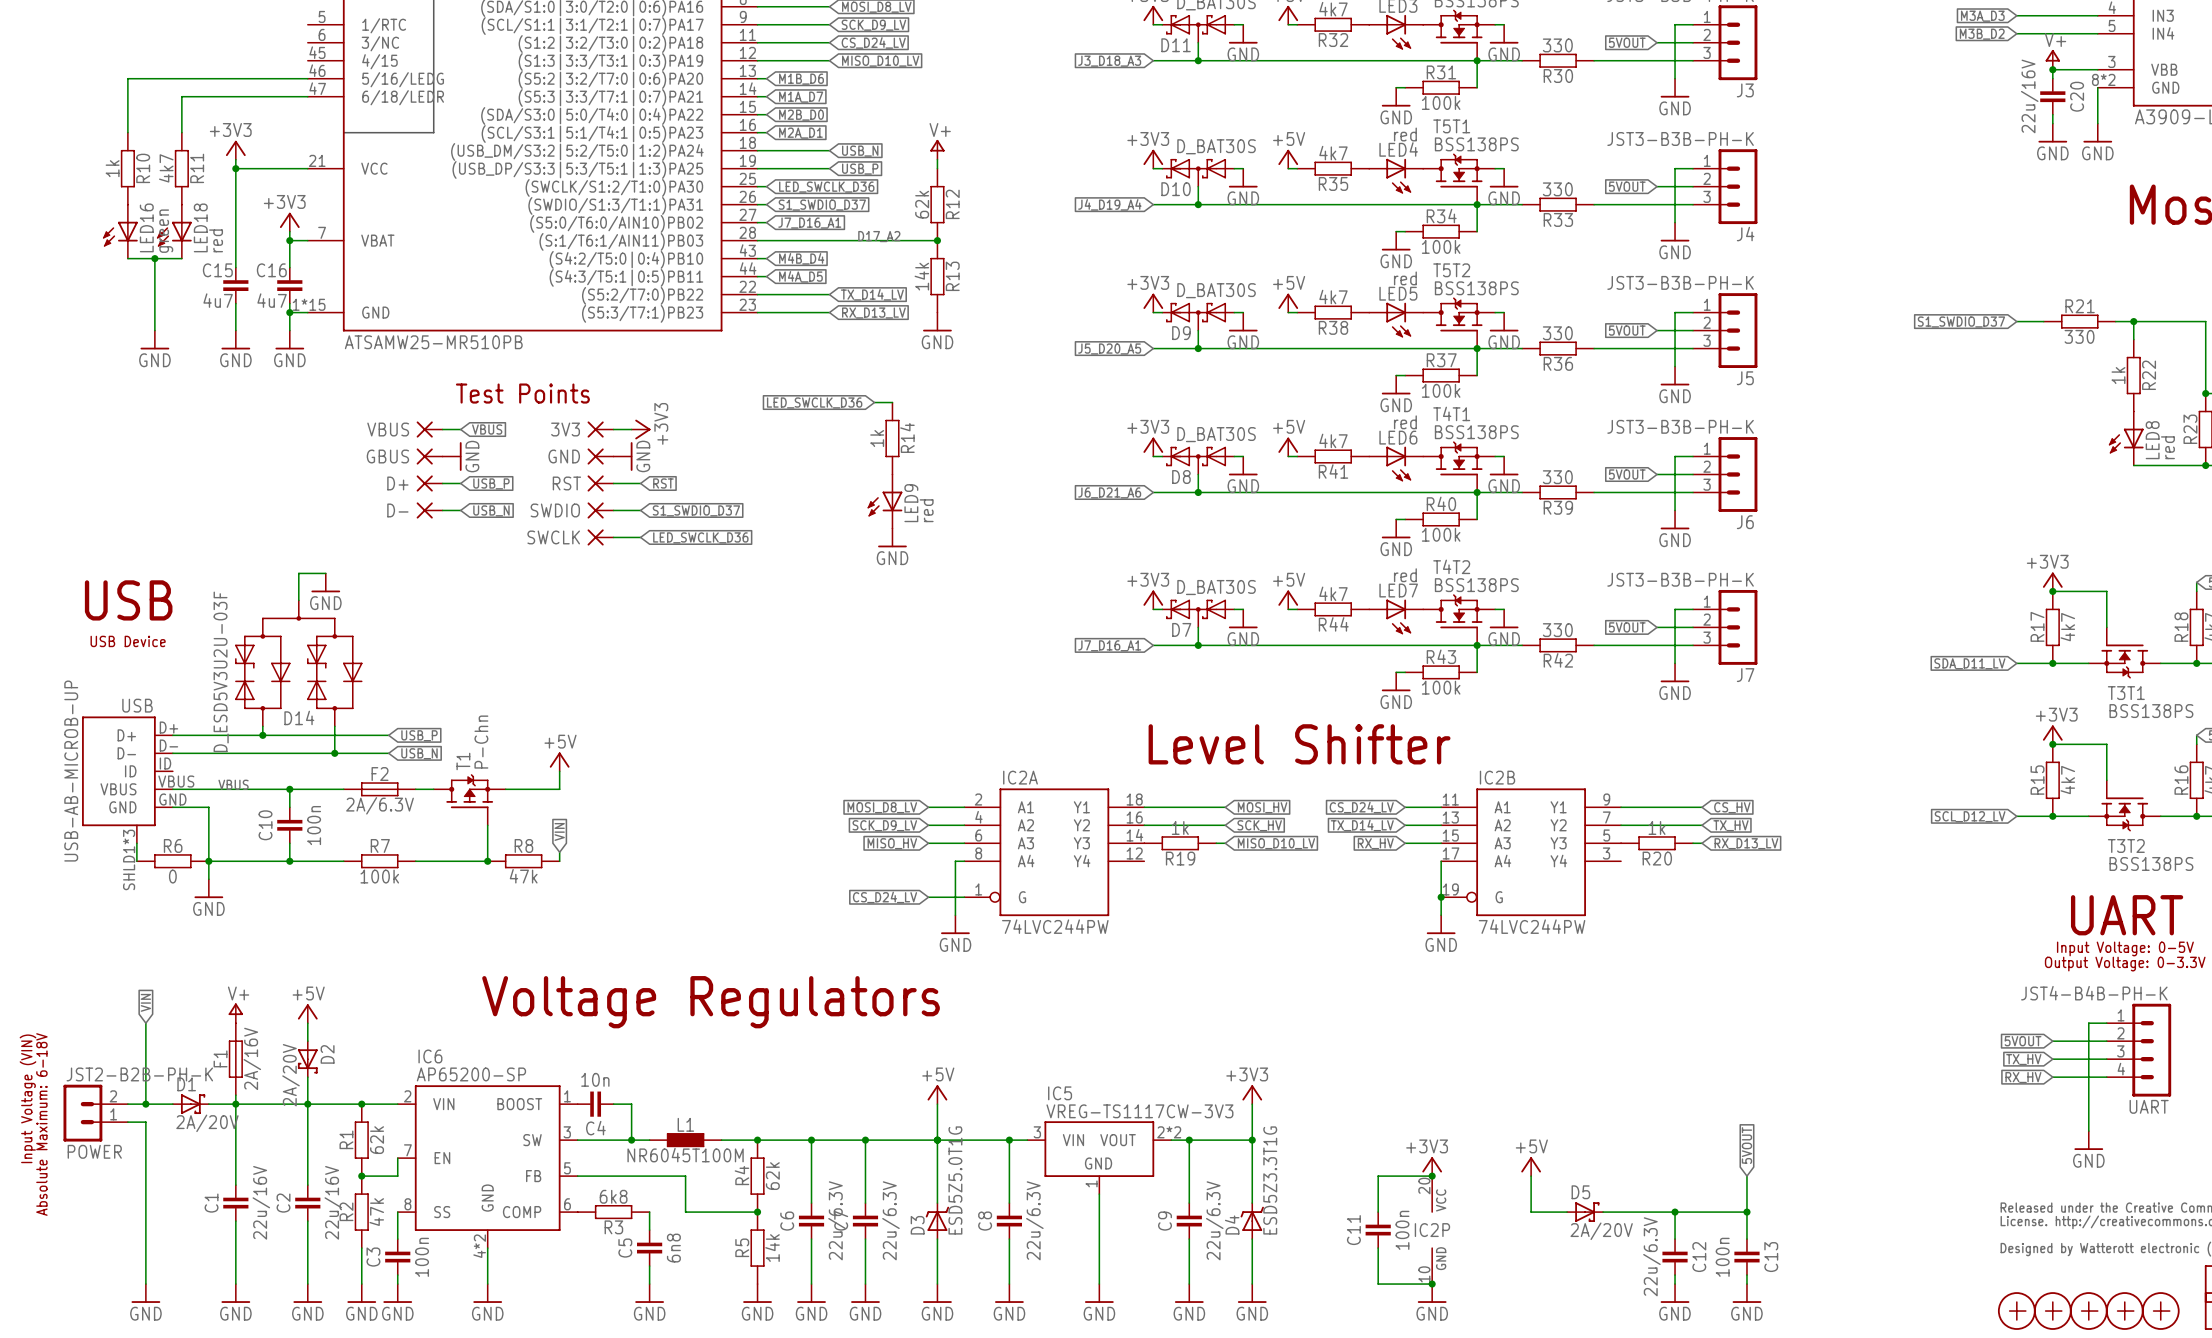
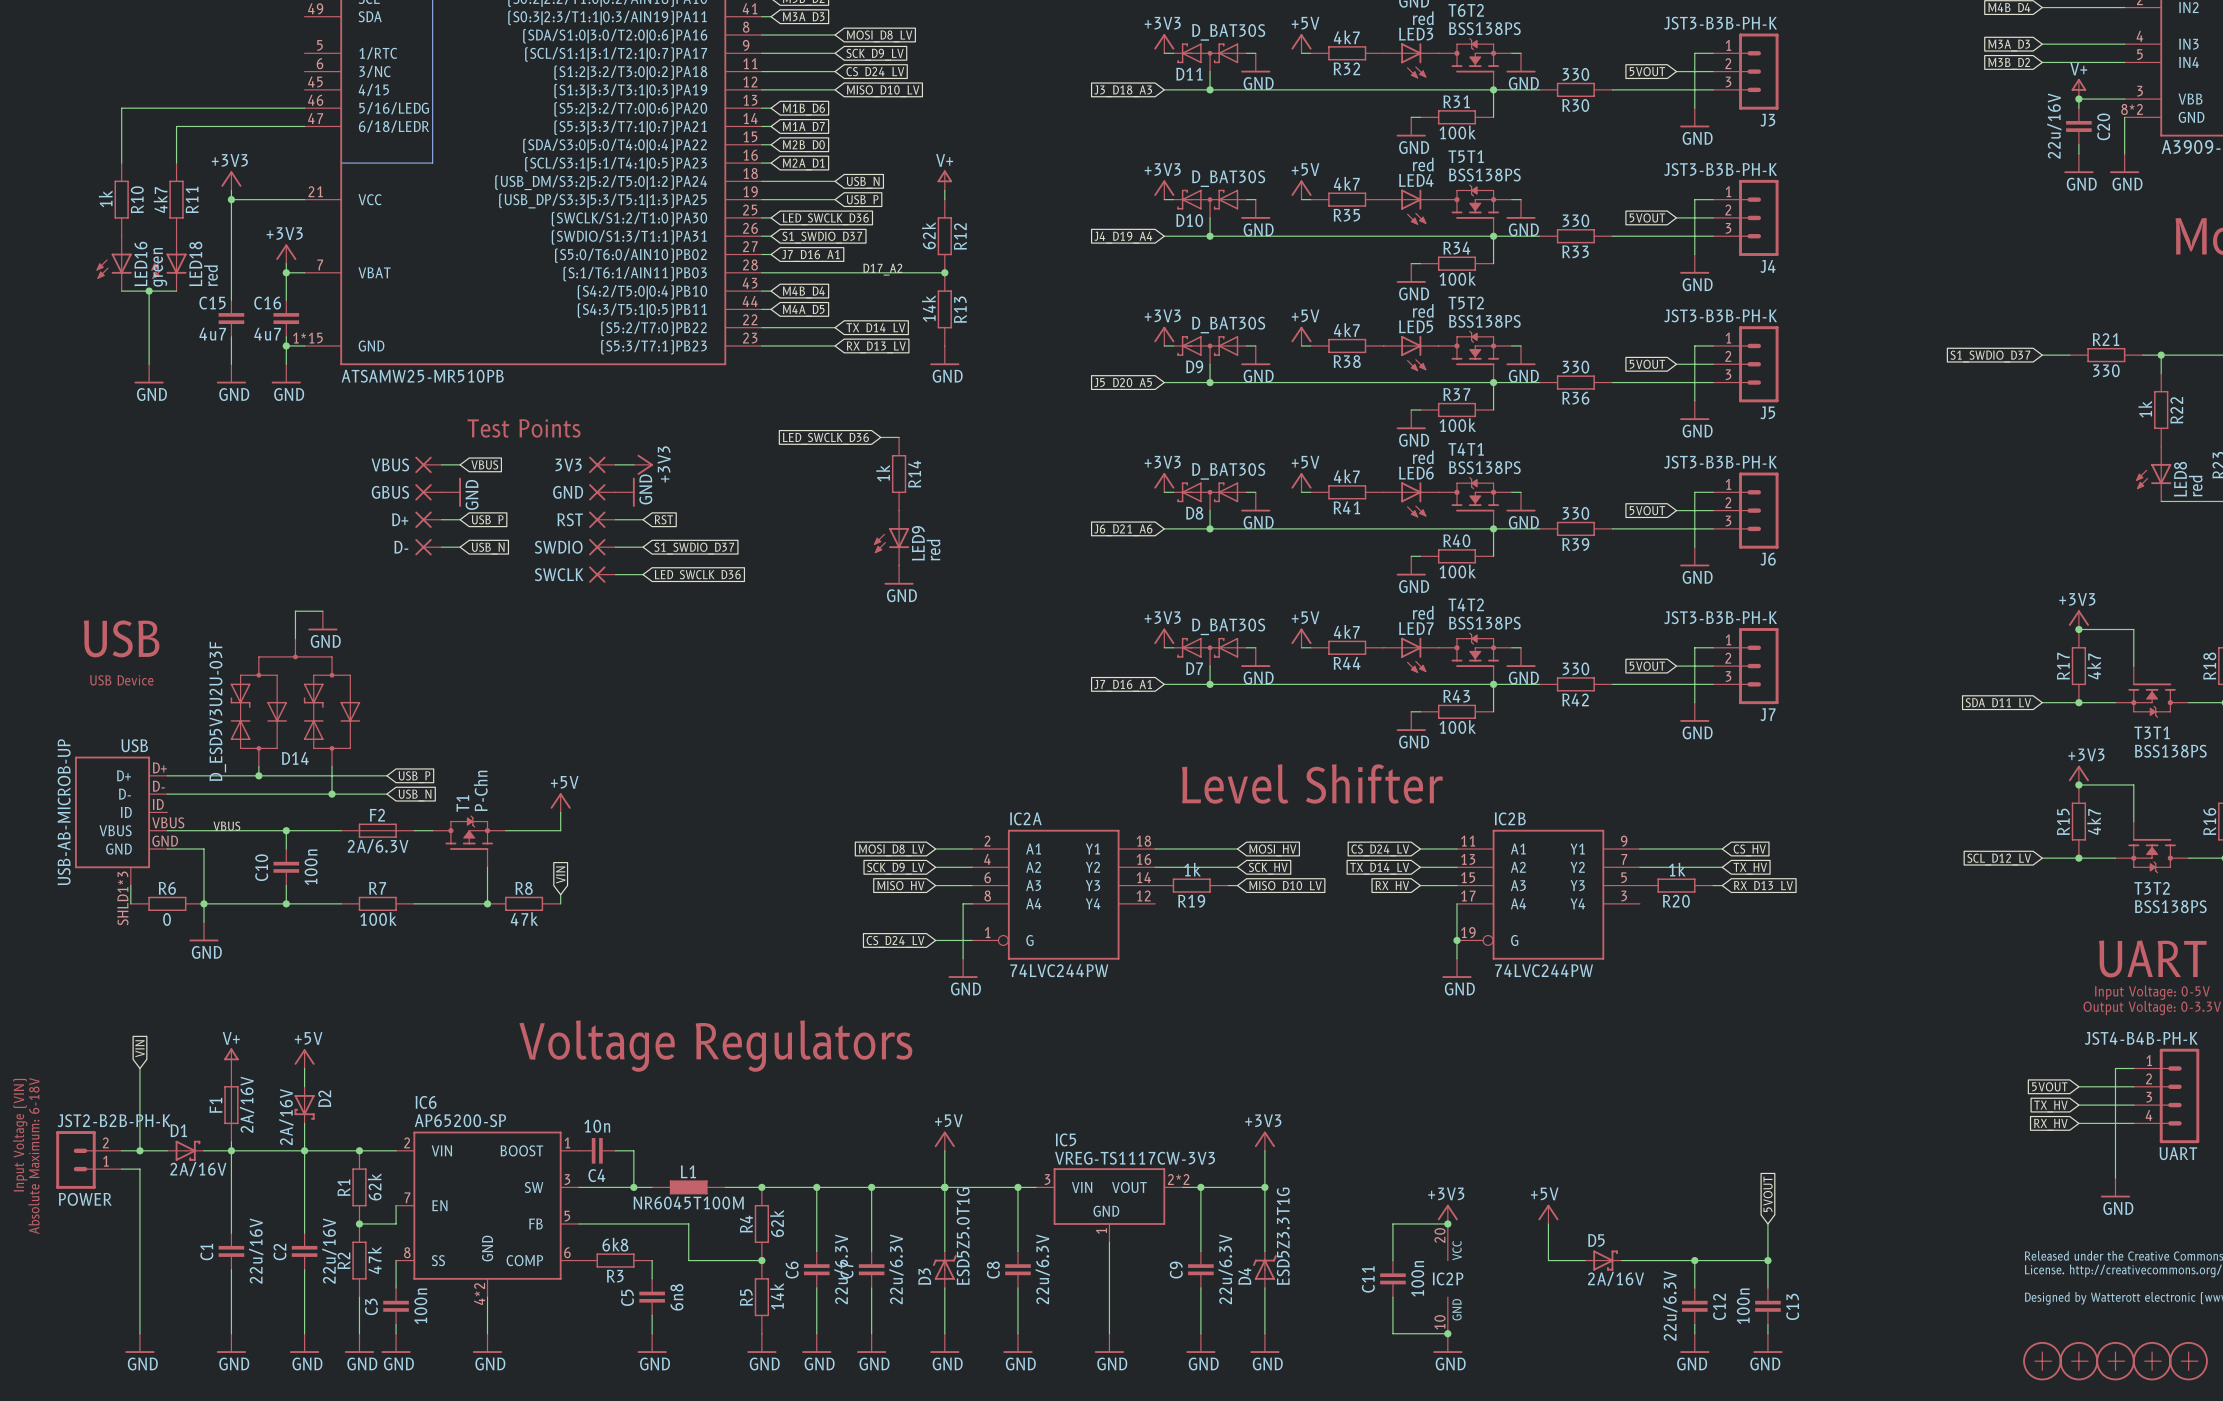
D2 value: 2A/20V (291, 1075) -> 2A/16V (286, 1117)
D1 value: 2A/20V (207, 1123) -> 2A/16V (198, 1169)
D5 value: 2A/20V (1601, 1231) -> 2A/16V (1616, 1278)

